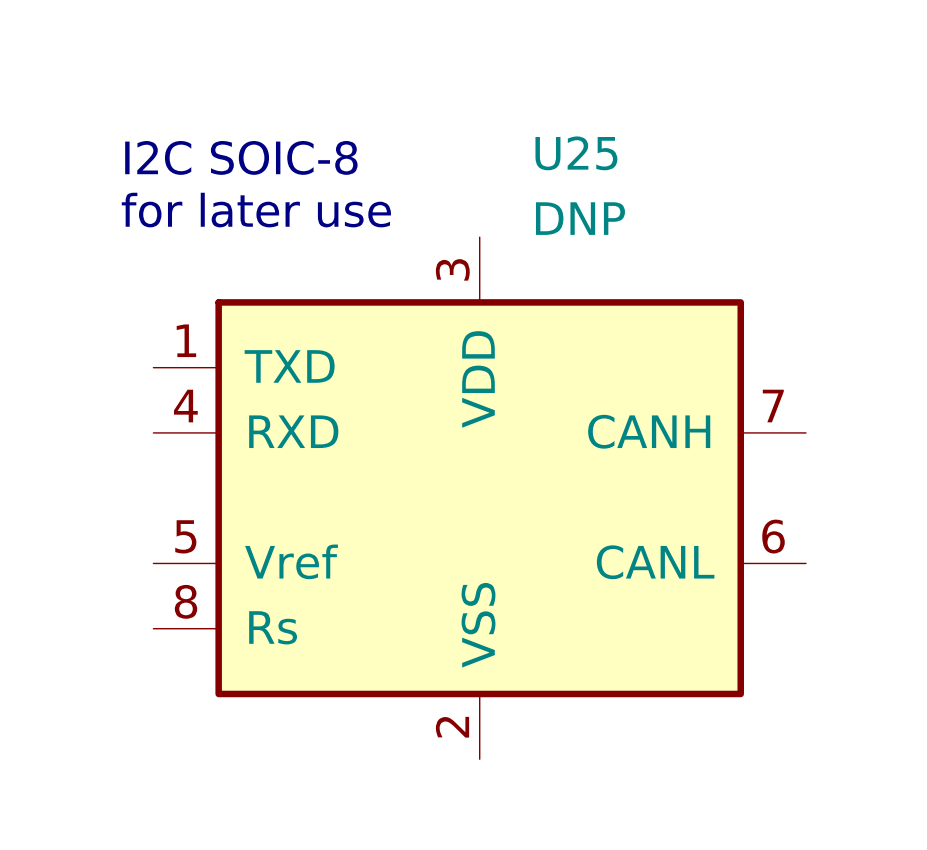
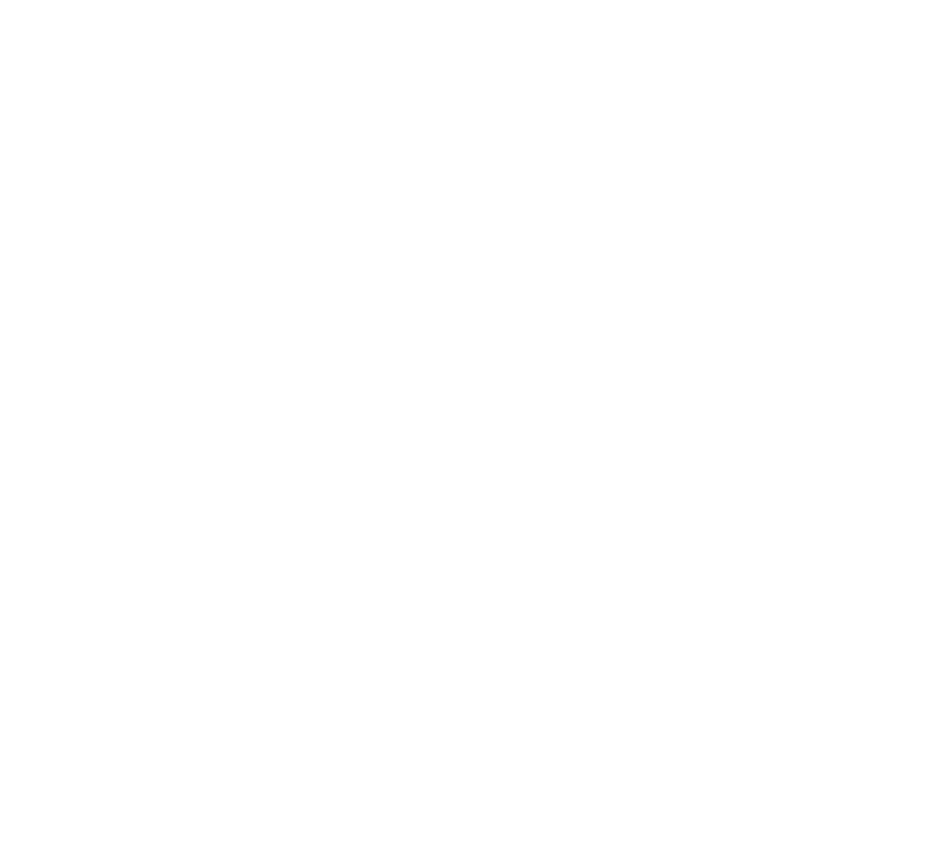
text: I2C SOIC-8 (241, 157) -> none
text: for later use (256, 210) -> none
U25: DNP (479, 498) -> none

